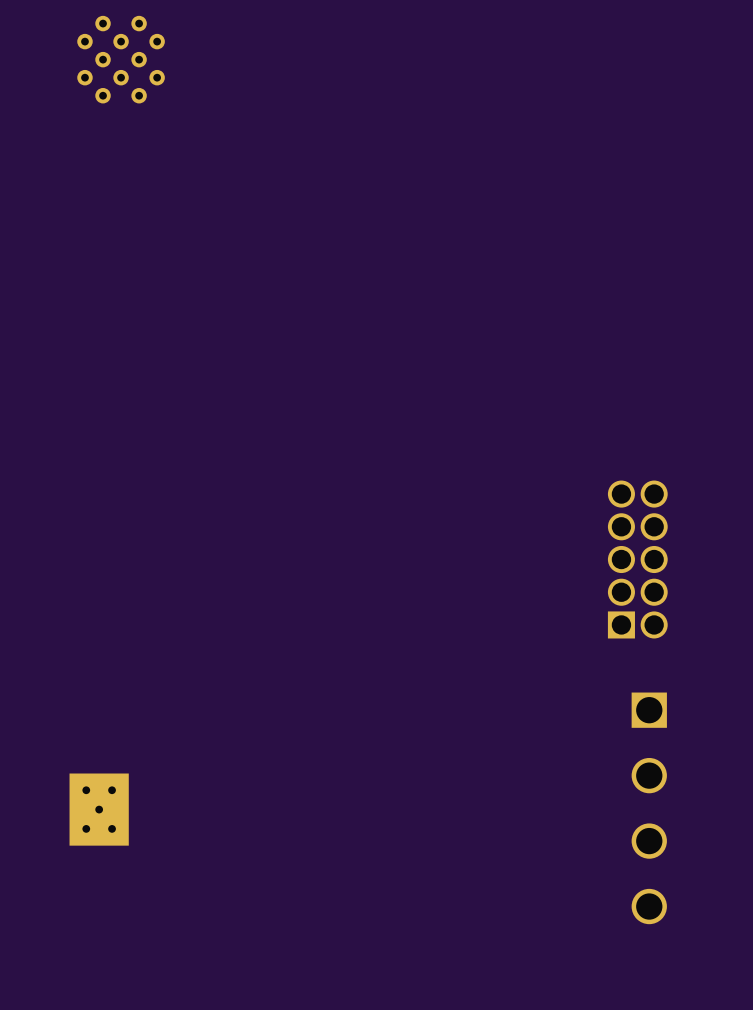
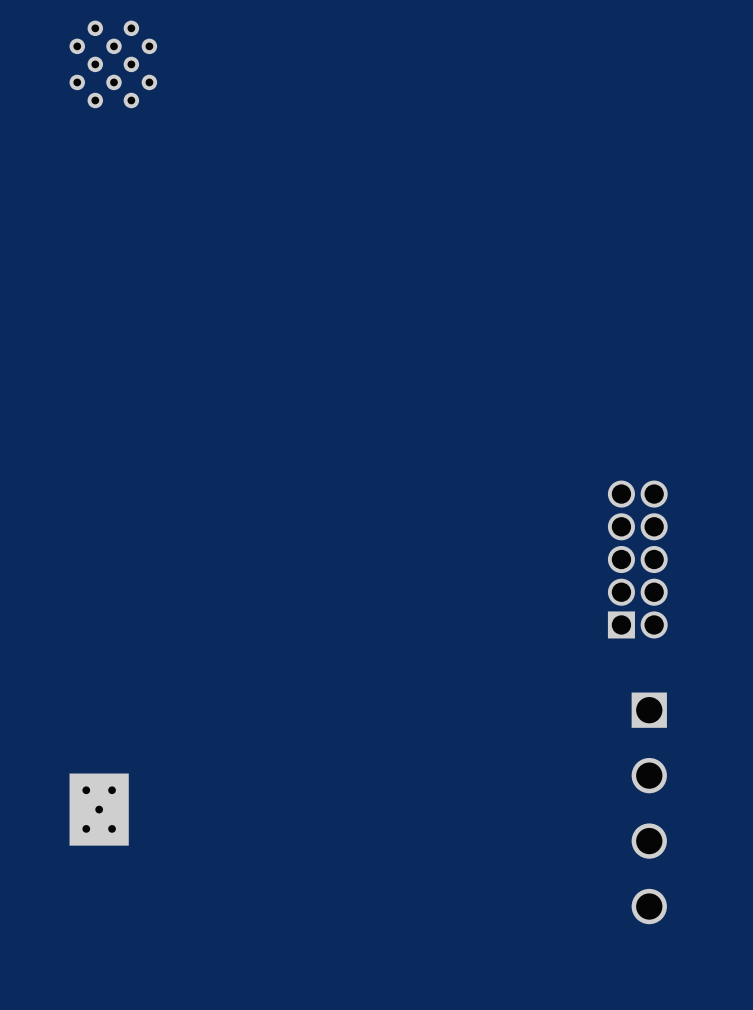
part footprint: [77, 15, 165, 104] -> [69, 20, 158, 109]

